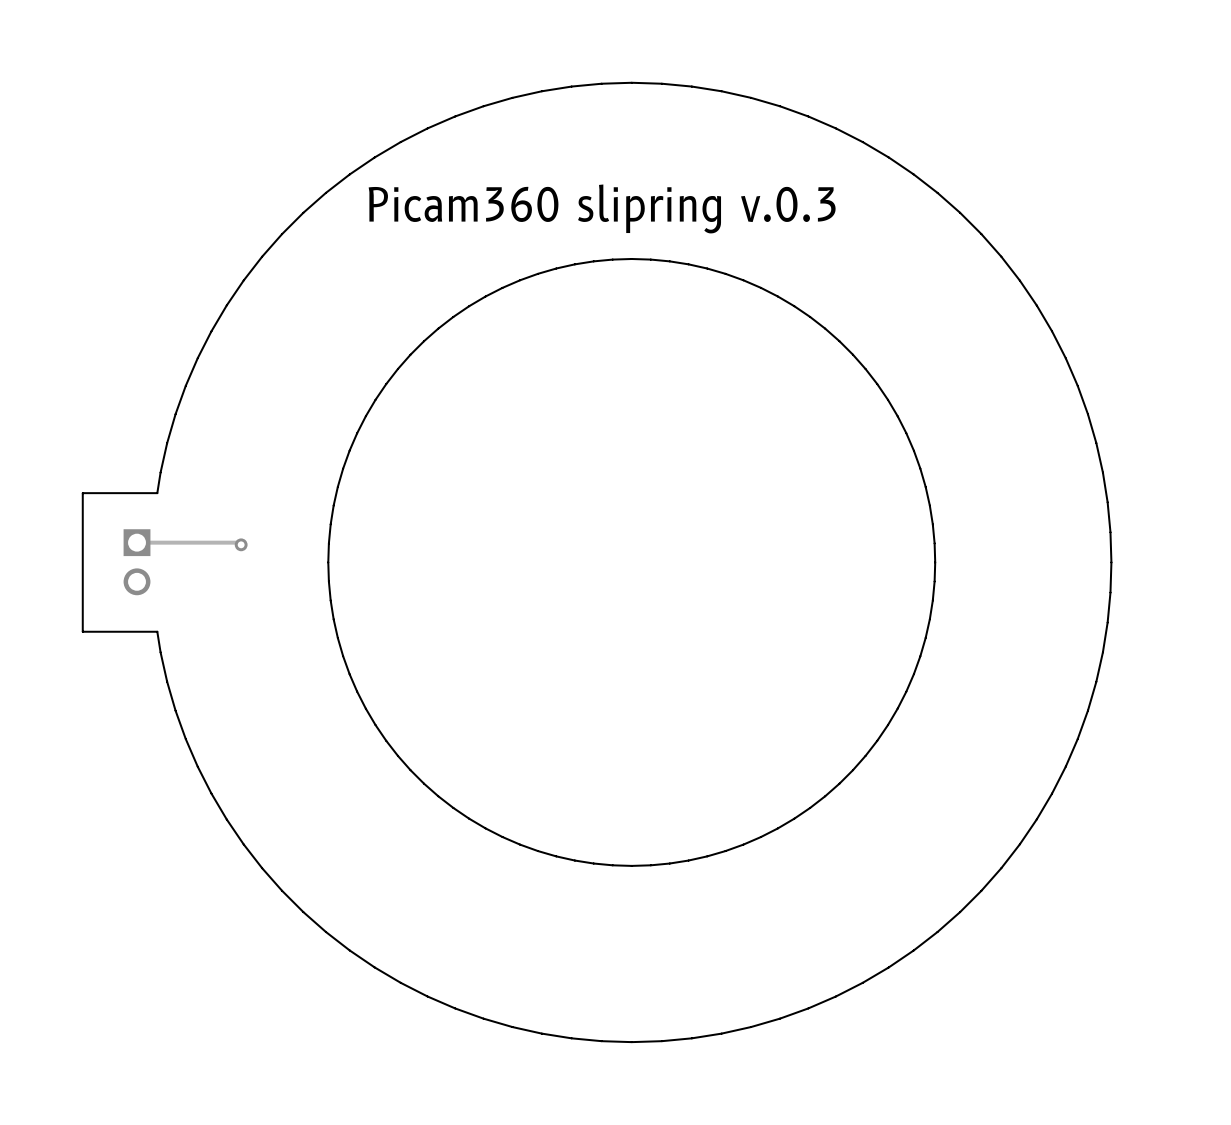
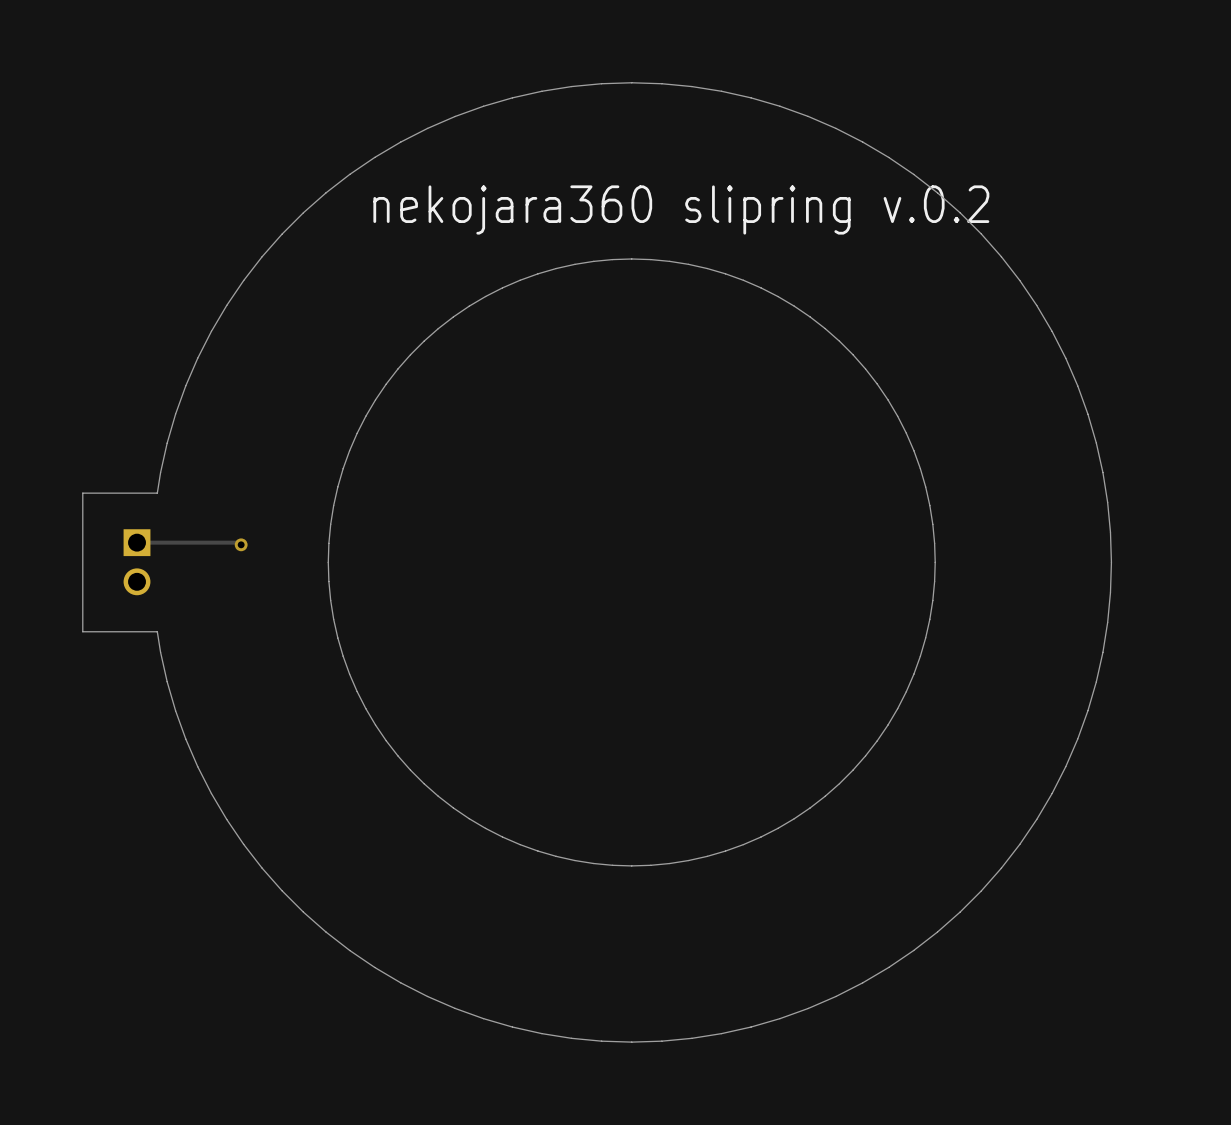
text: Picam360 slipring v.0.3 (602, 208) -> nekojara360 slipring v.0.2 (681, 209)

